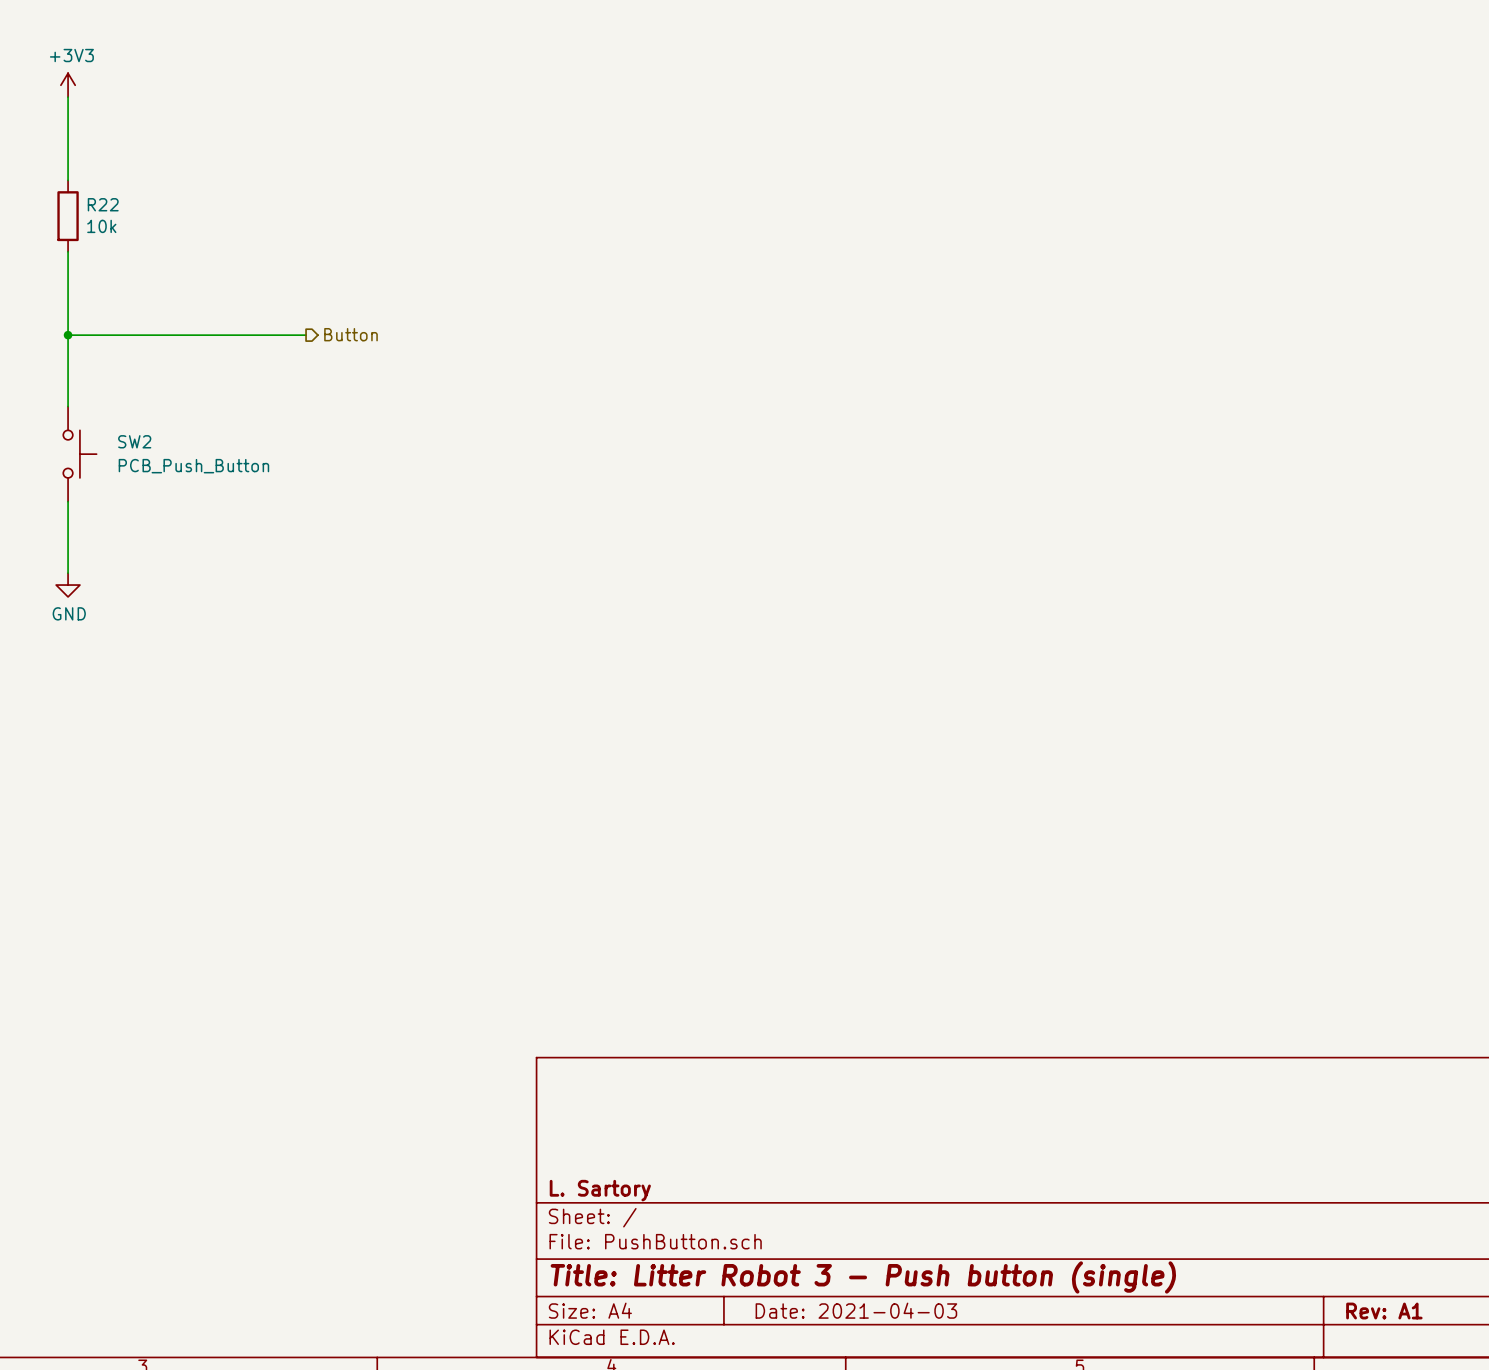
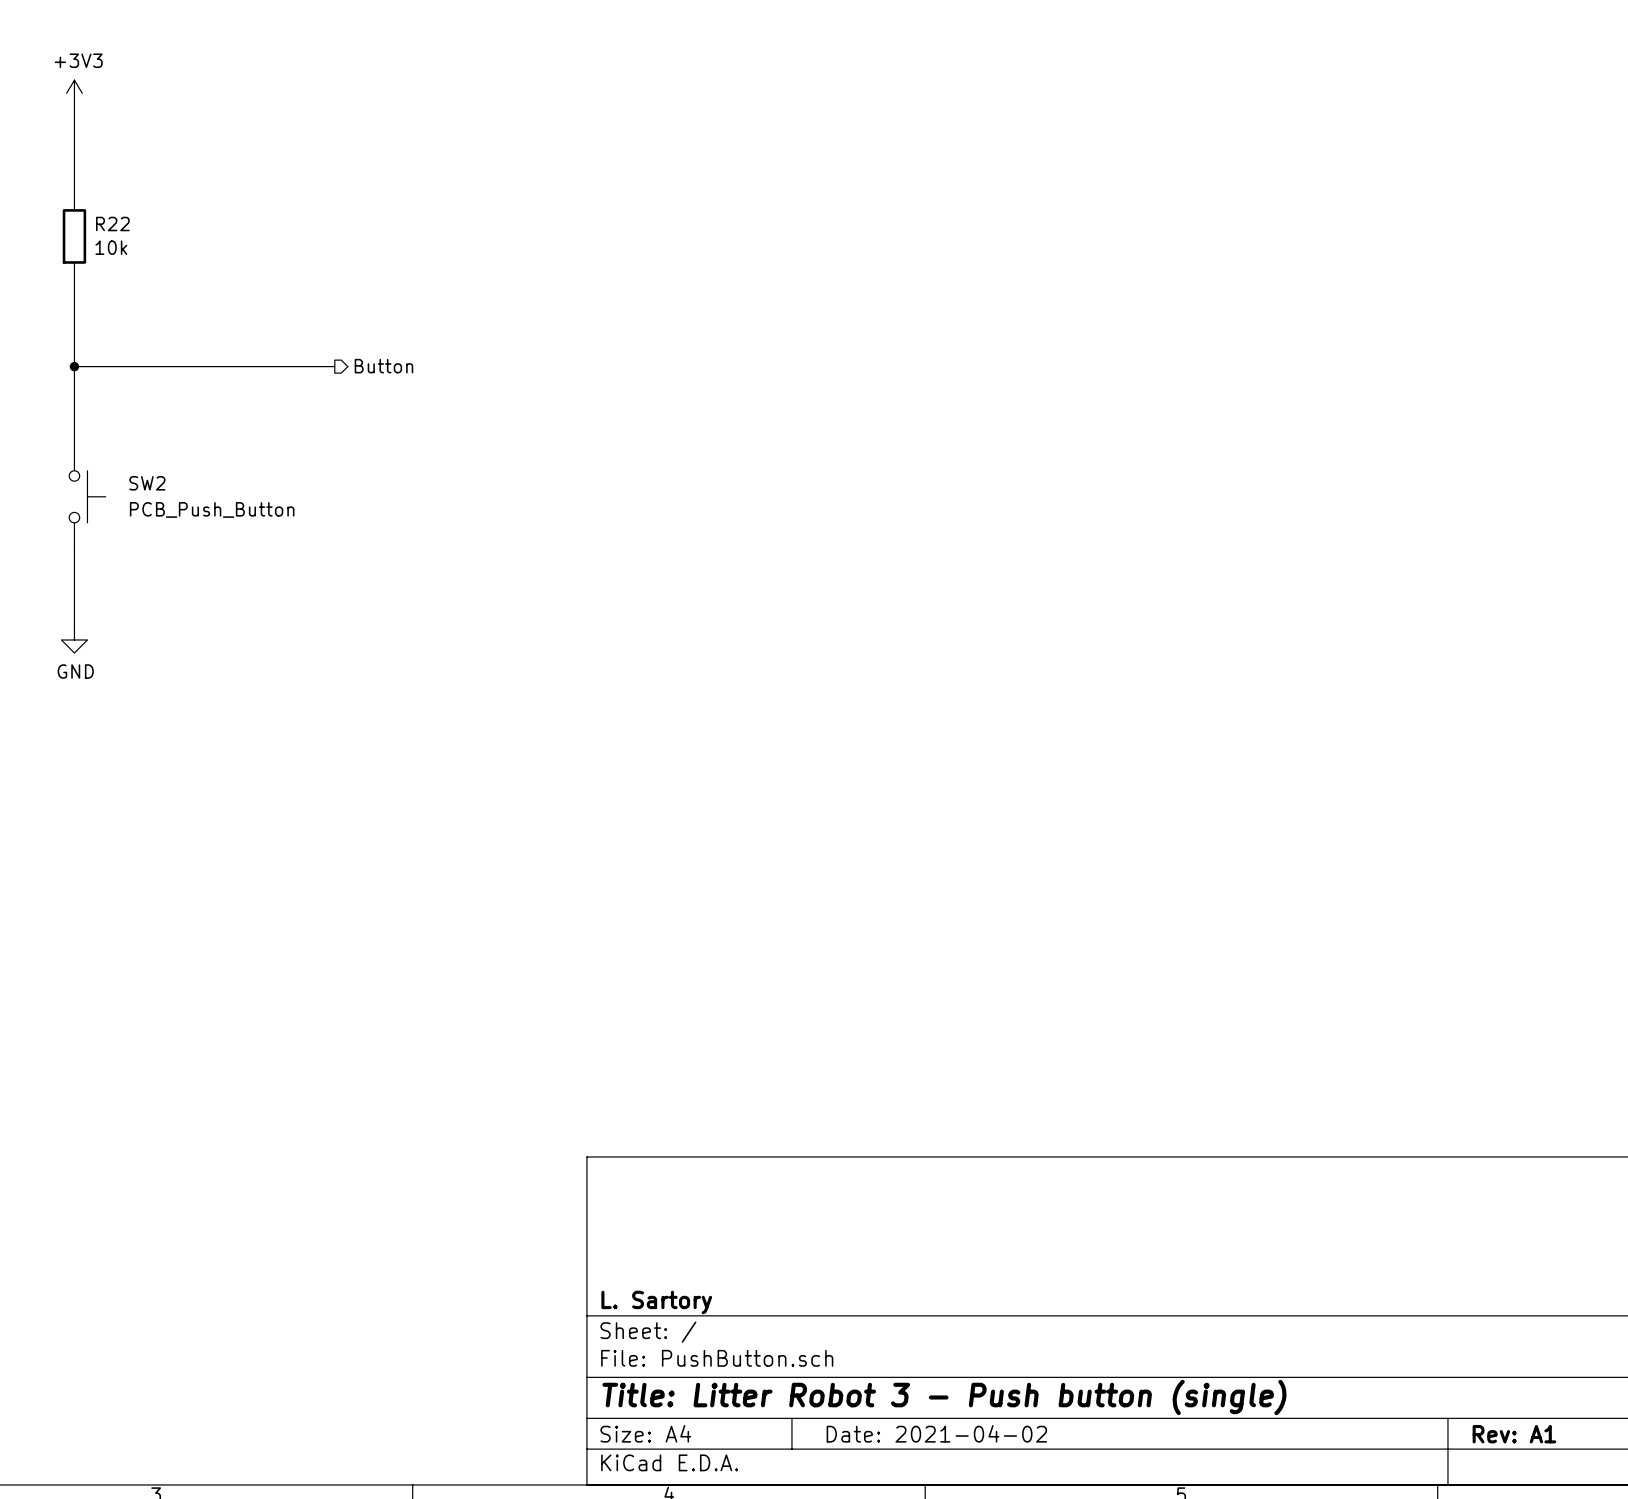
title block: Date: 2021-04-03 (856, 1310) -> Date: 2021-04-02 (936, 1433)

